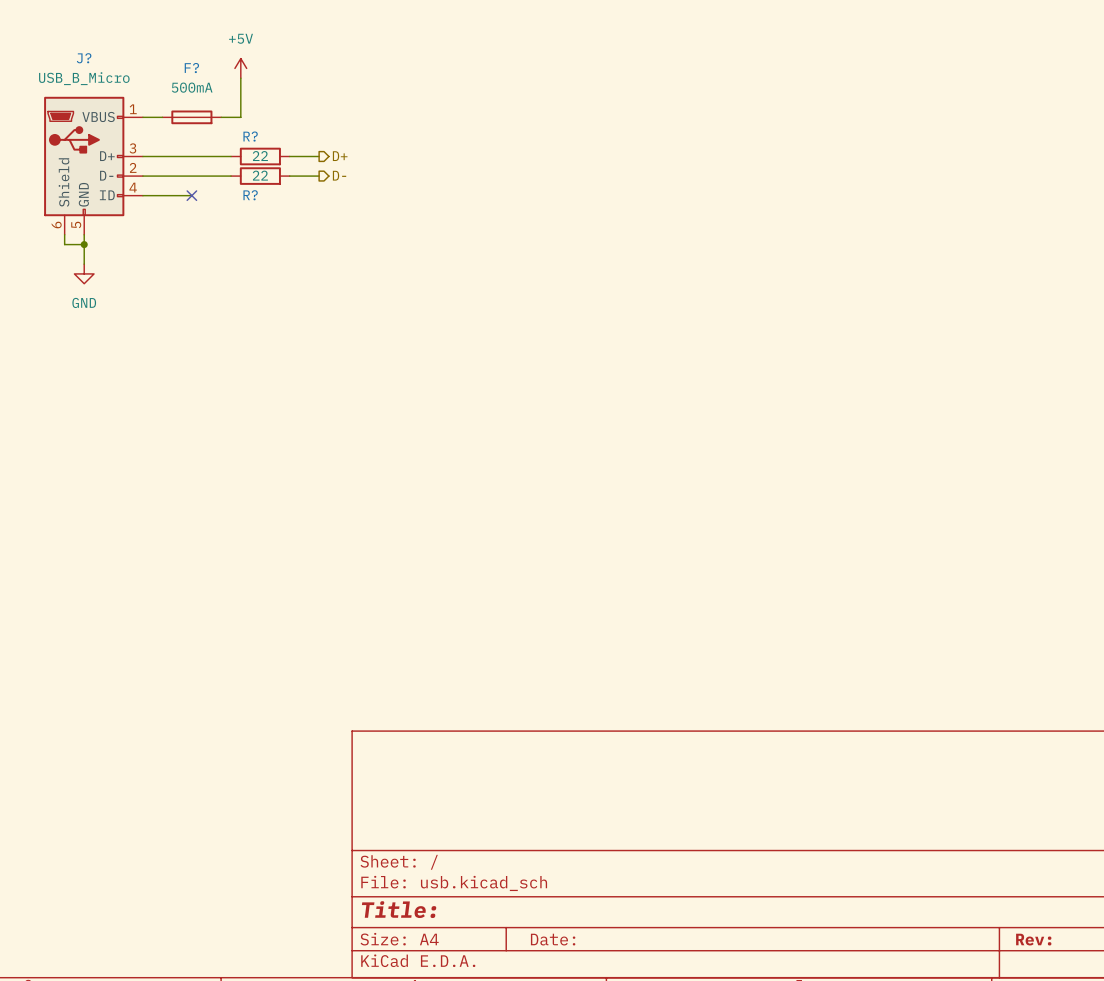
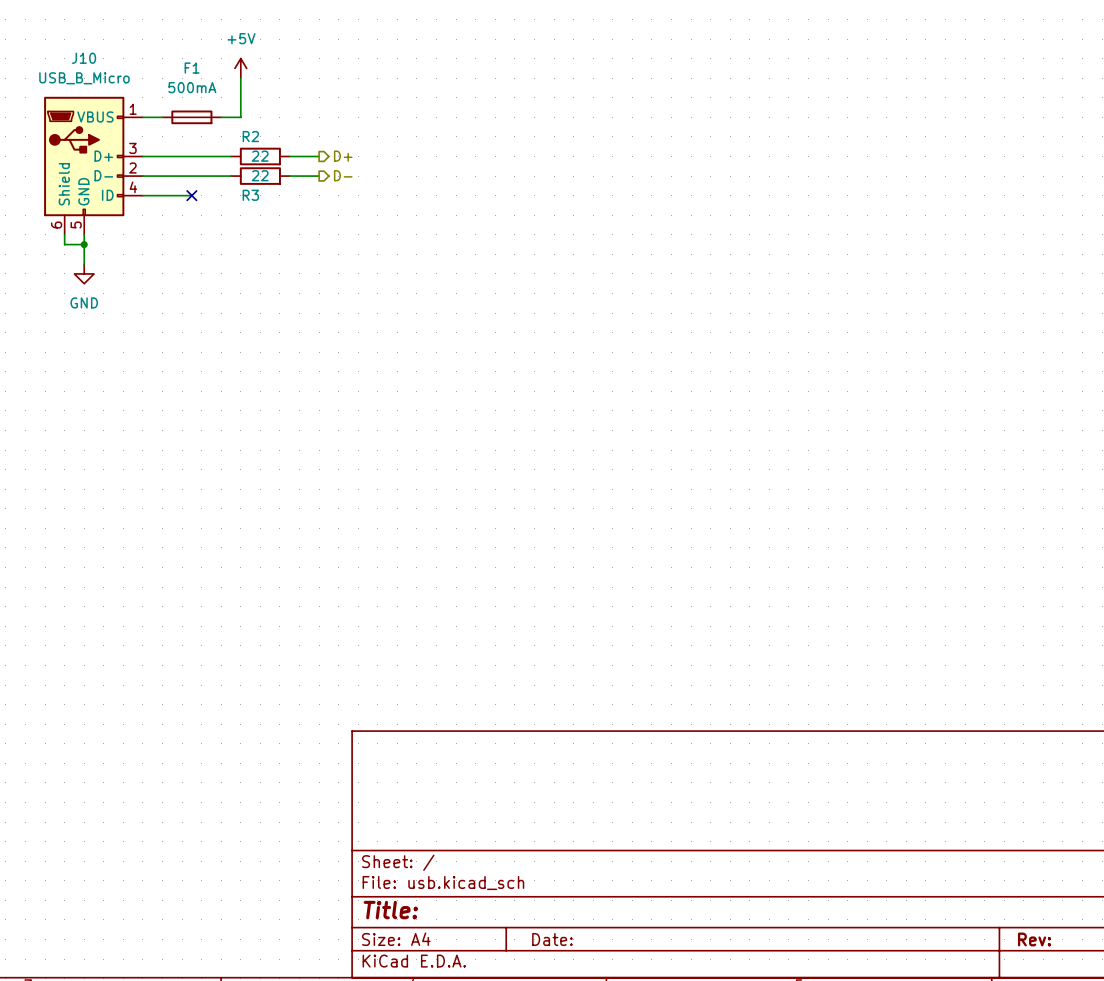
J? name: J? (84, 58) -> J10 (83, 58)
F? name: F? (191, 68) -> F1 (192, 68)
R? name: R? (250, 136) -> R2 (250, 136)
R? name: R? (250, 195) -> R3 (250, 195)

